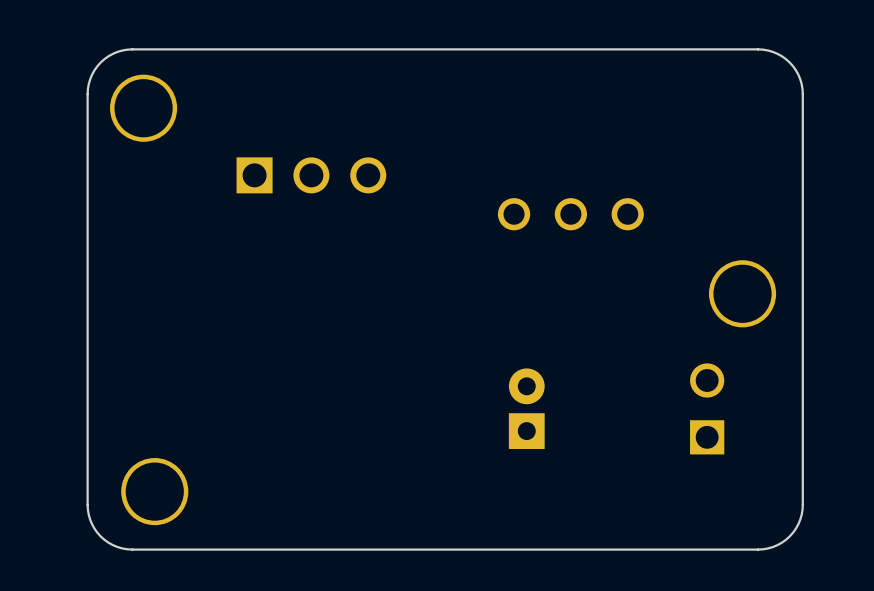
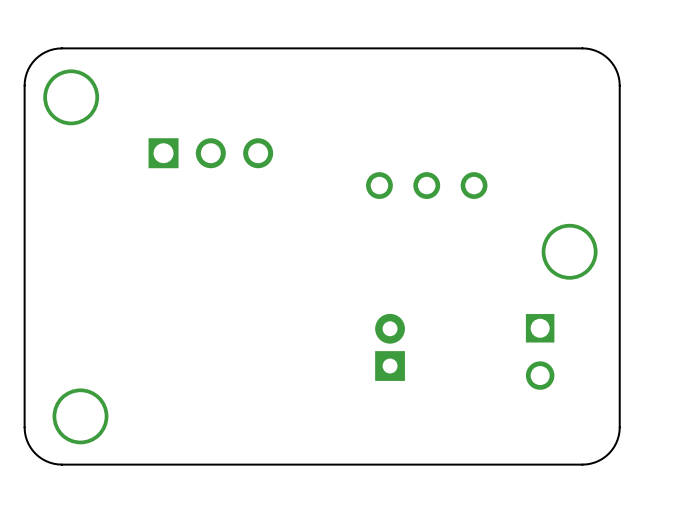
part rotation: 0° (707, 408) -> 180° (540, 351)

